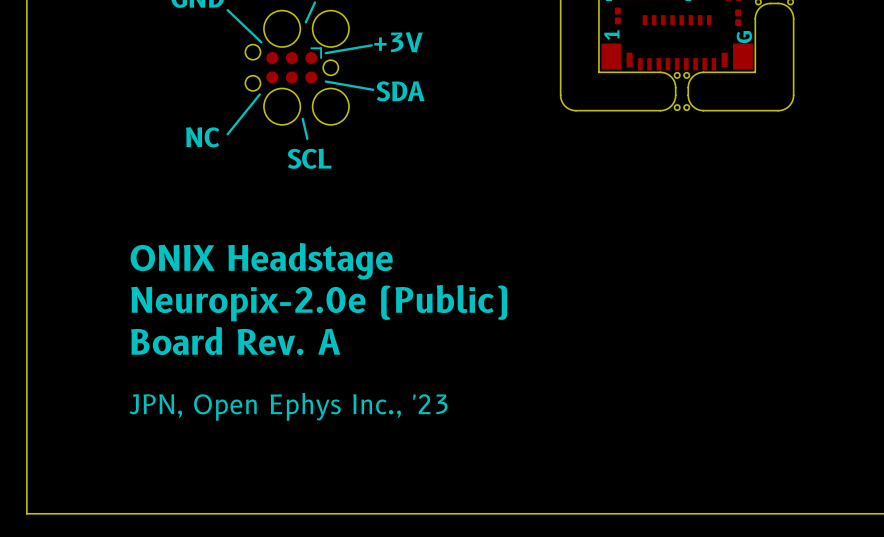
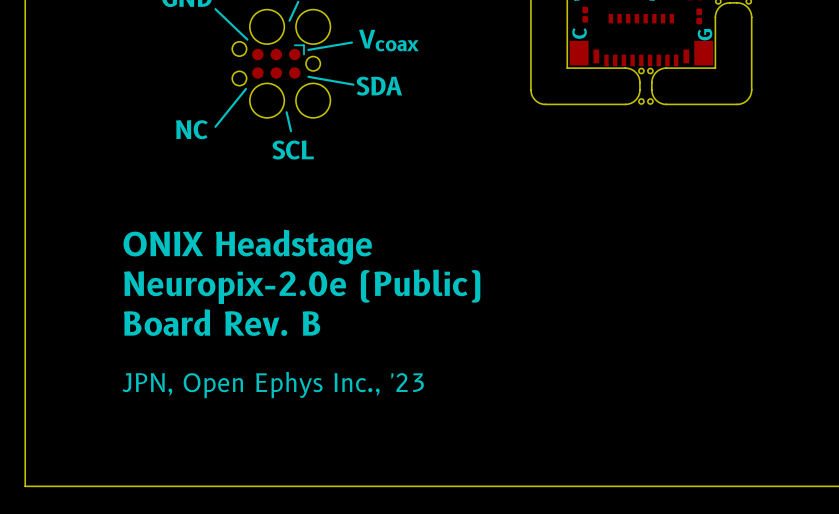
text: 1 (611, 35) -> C (579, 33)
text: +3V (398, 42) -> Vcoax (388, 40)
text: Board Rev. A (235, 341) -> Board Rev. B (222, 322)

